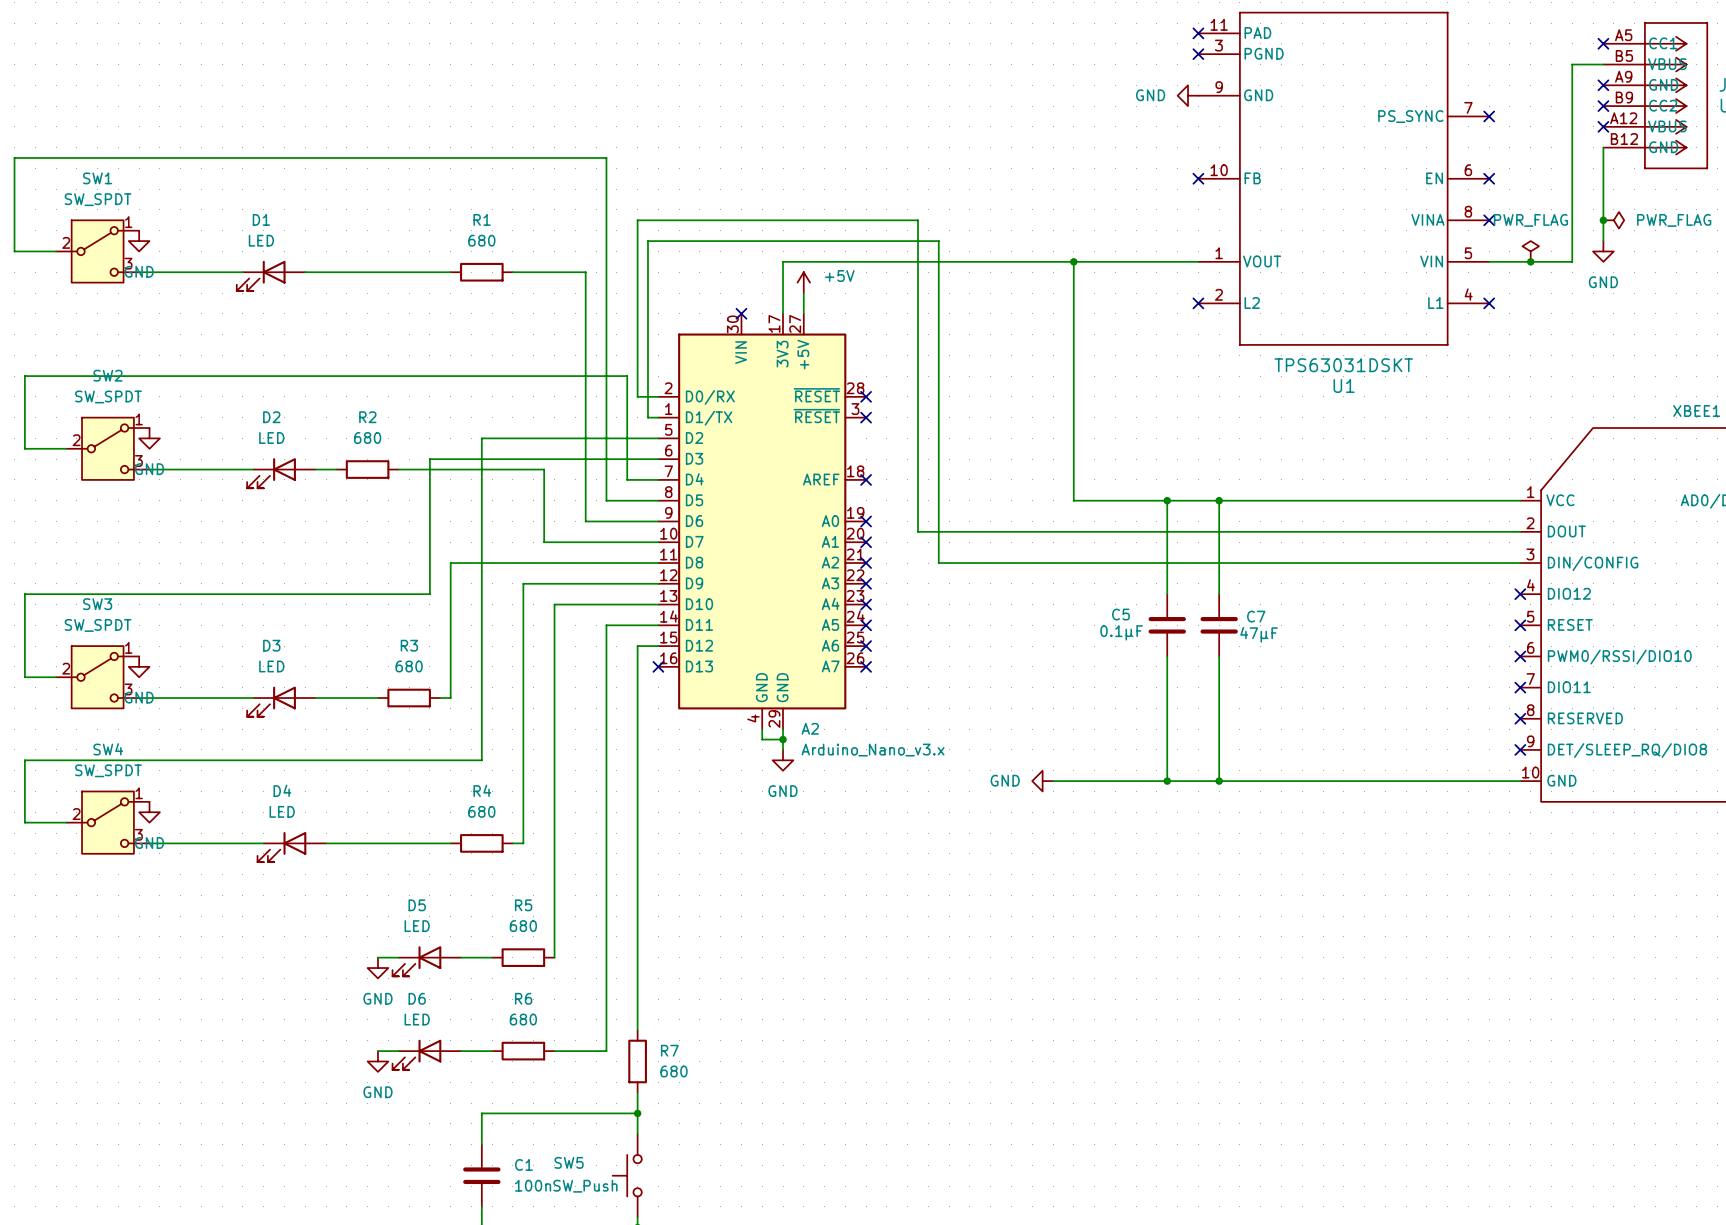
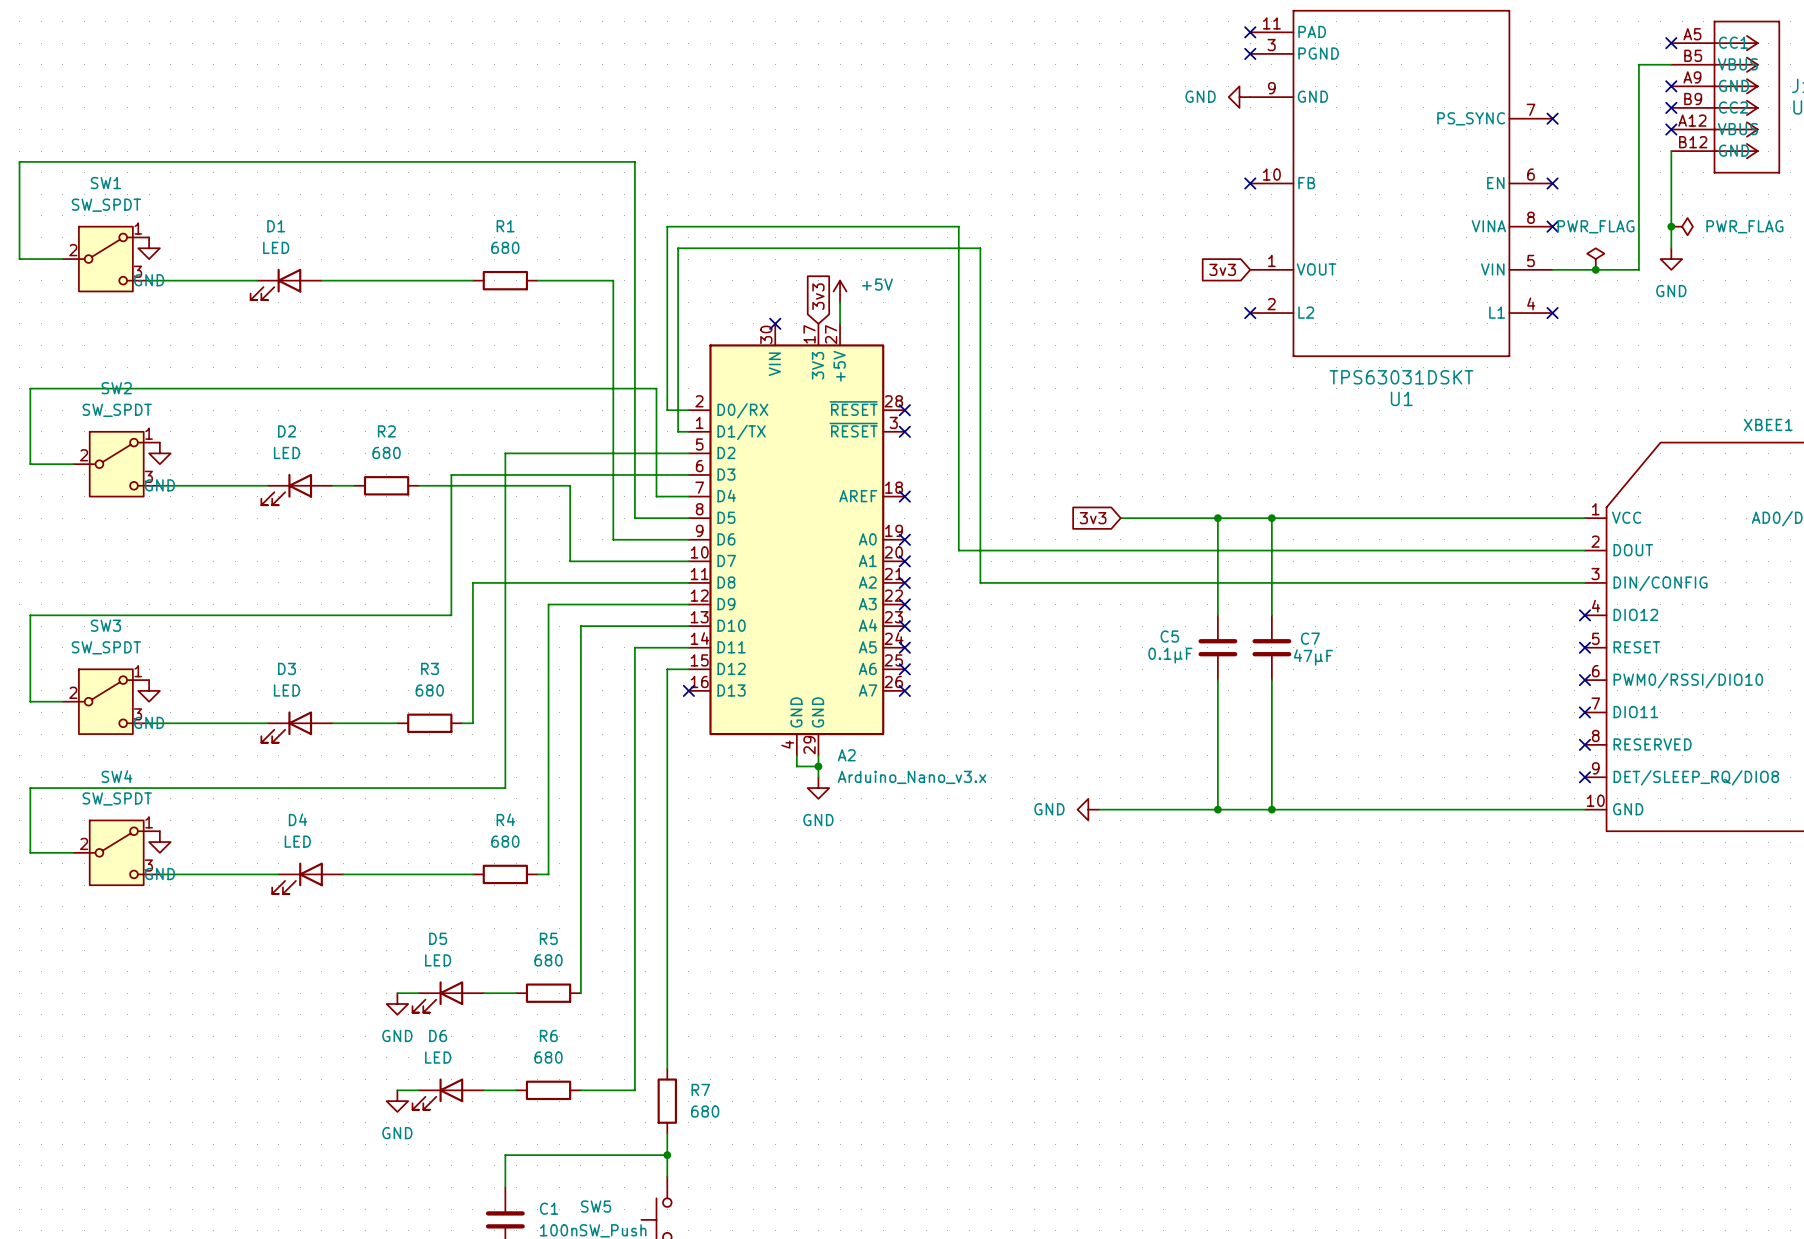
wire: (1073, 261) (1073, 500) -> none
junction: (1073, 261) -> none
global label: none -> 3v3 (1222, 269)
wire: (1198, 261) (783, 261) (783, 313) -> none
global label: none -> 3v3 (818, 296)
global label: none -> 3v3 (1093, 518)

